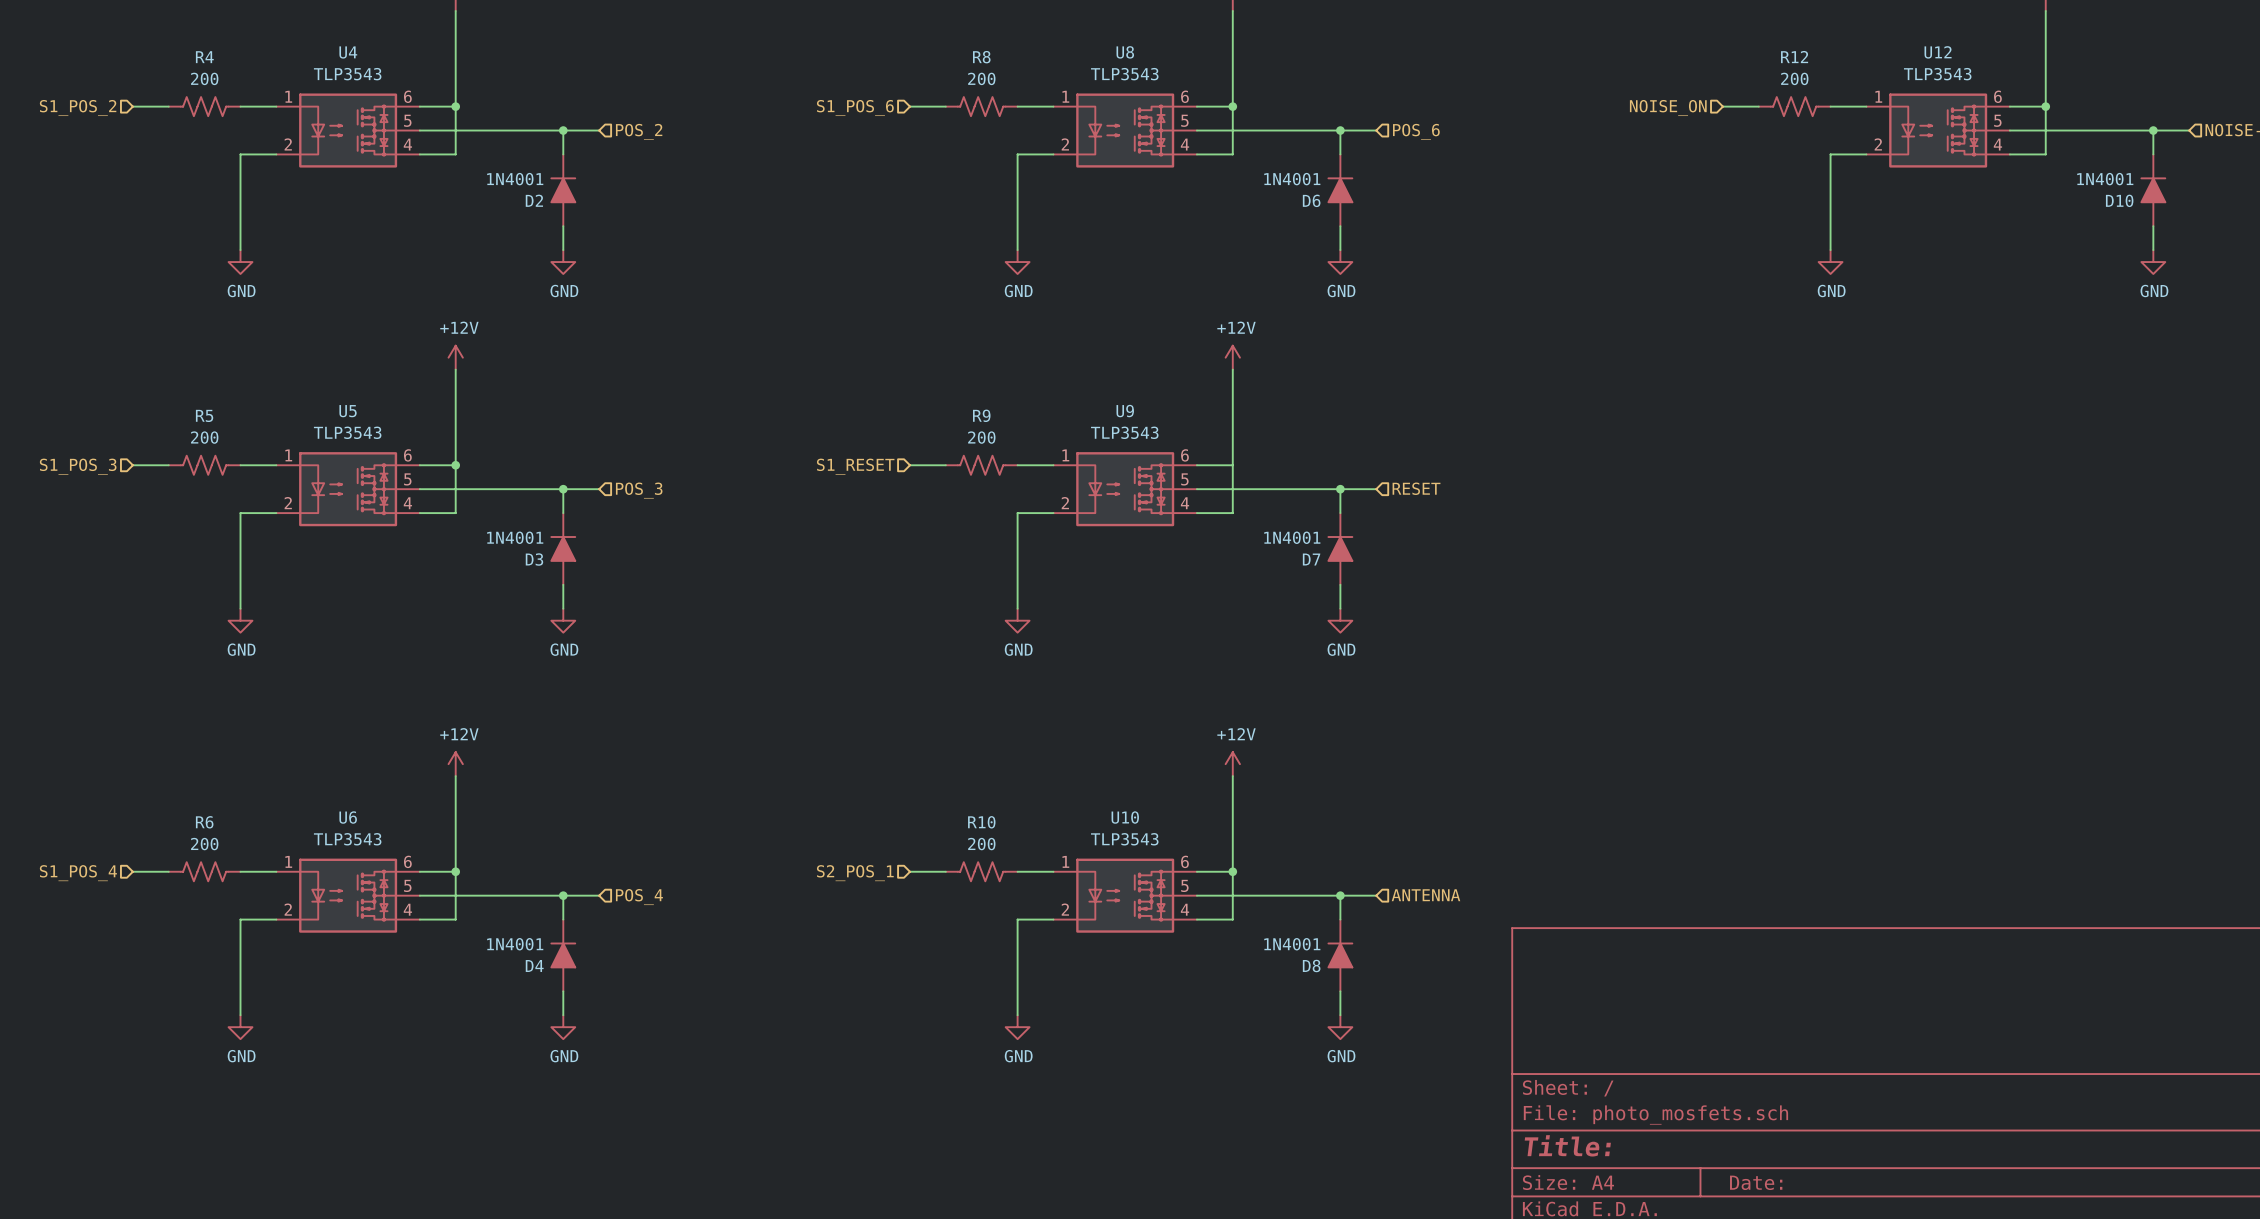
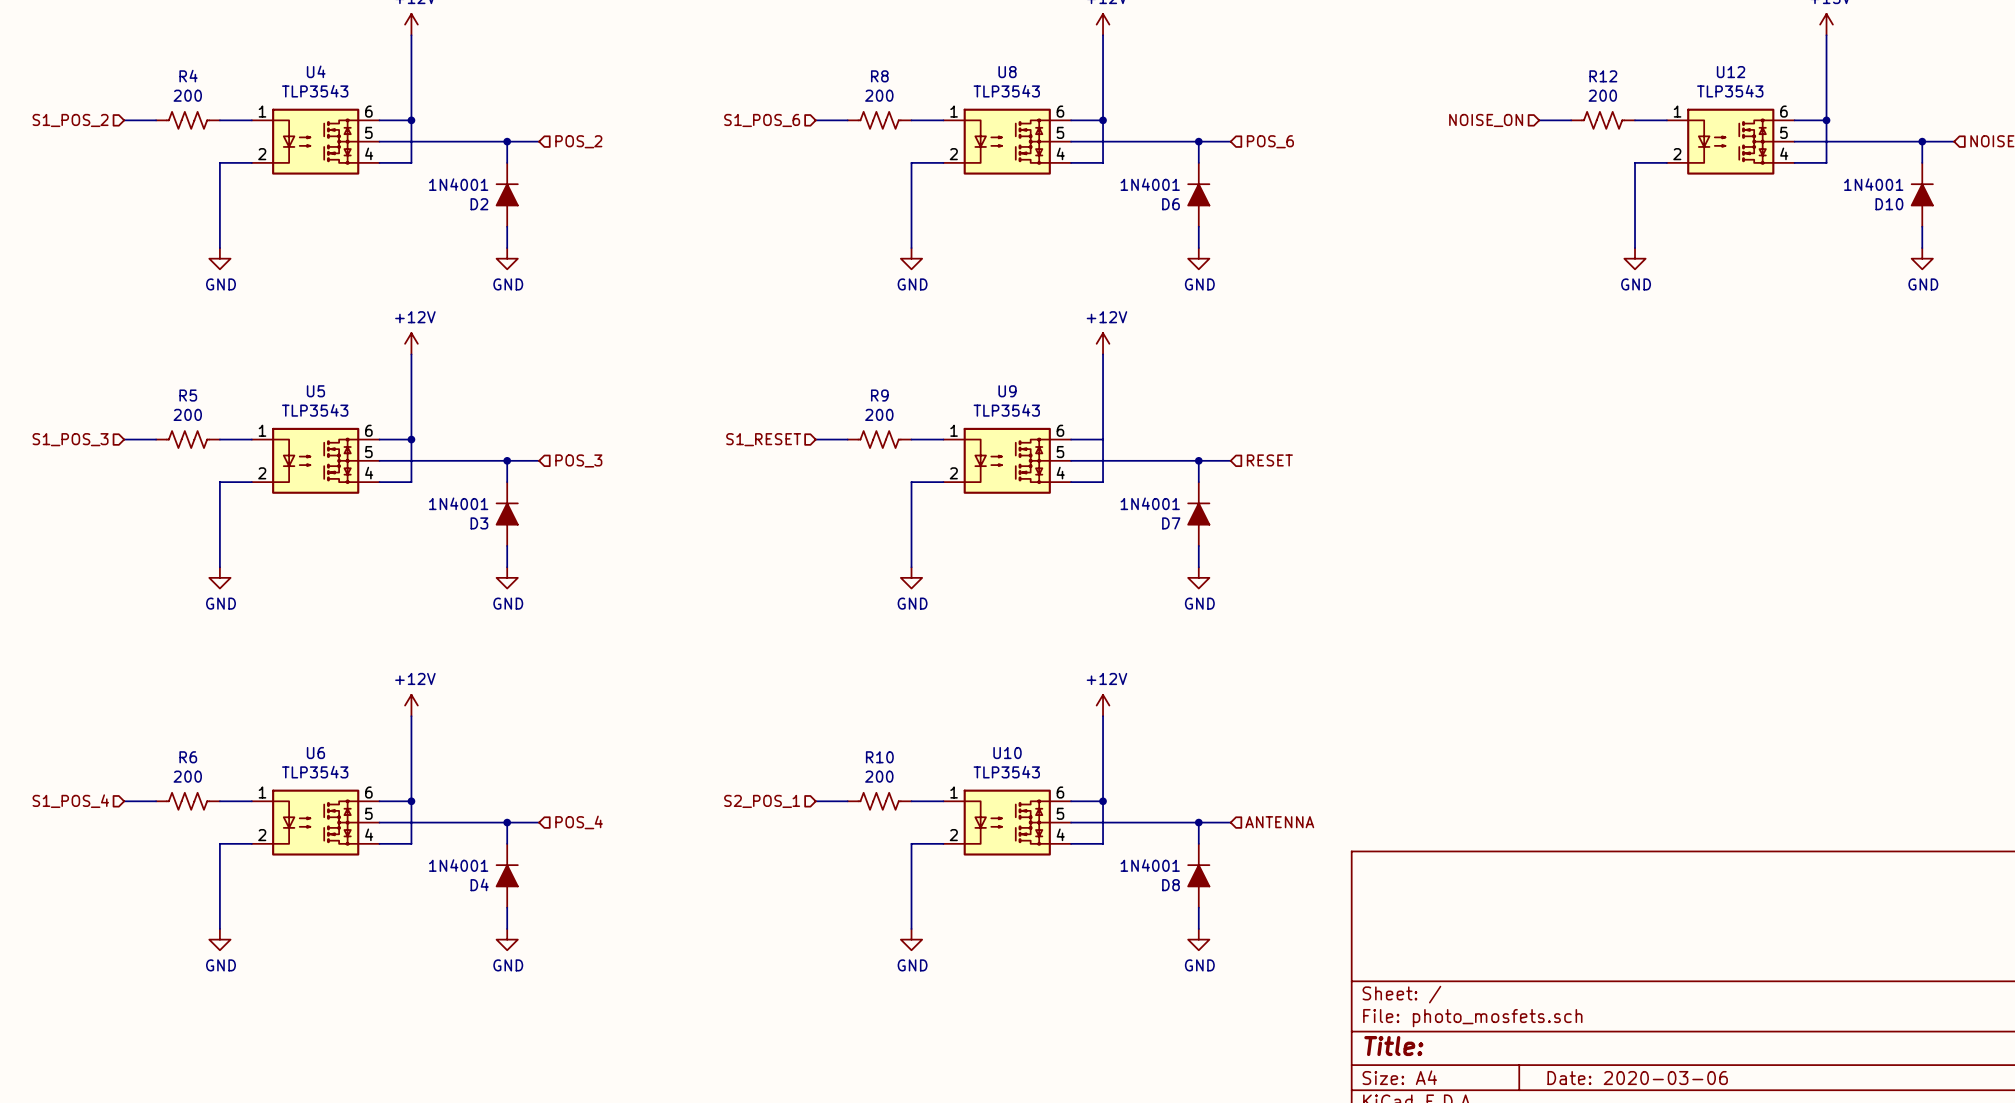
title block: Date: (1756, 1182) -> Date: 2020-03-06 (1637, 1078)

